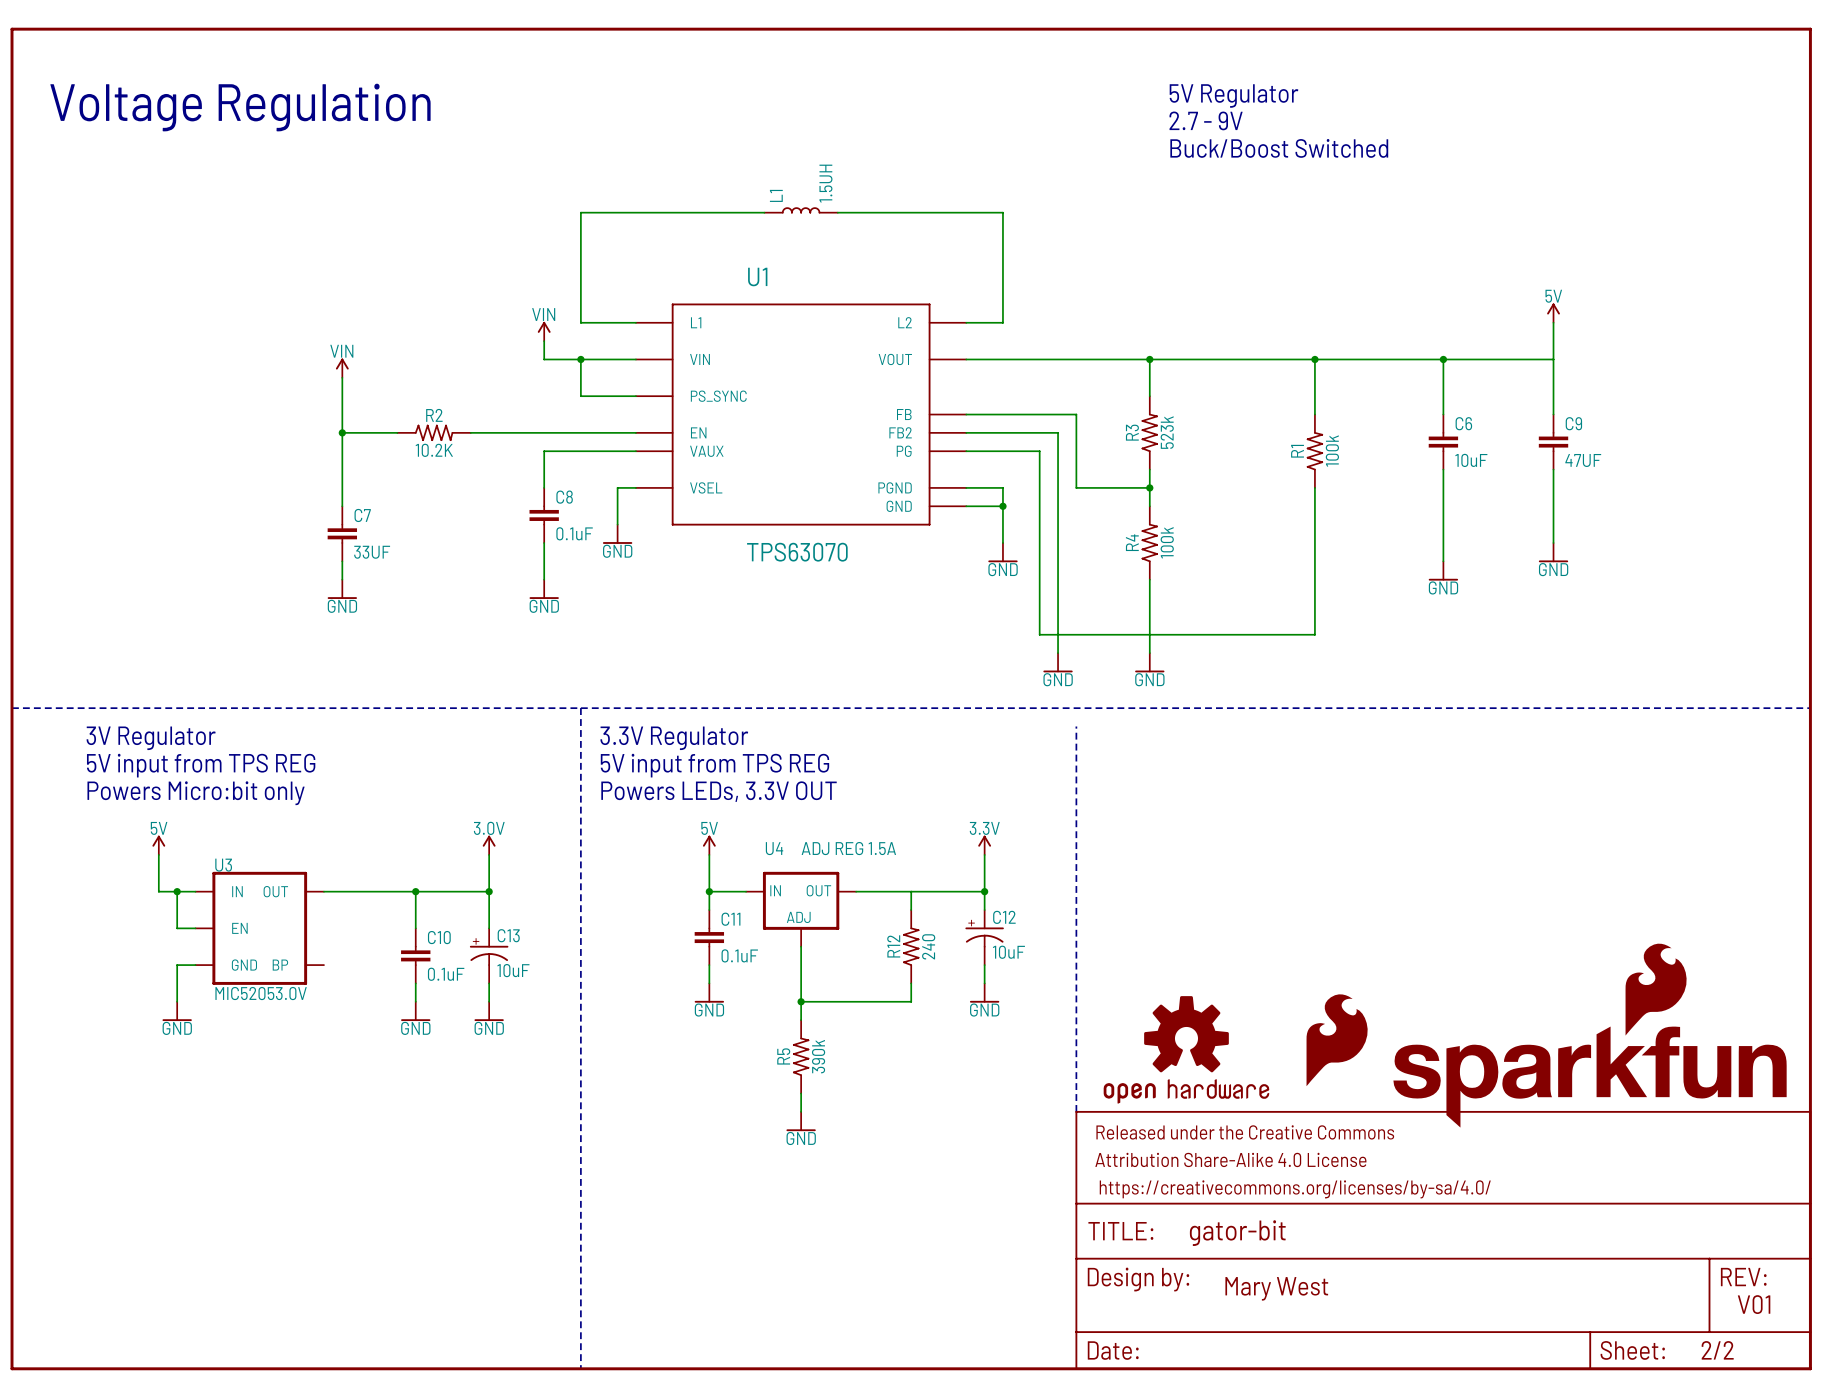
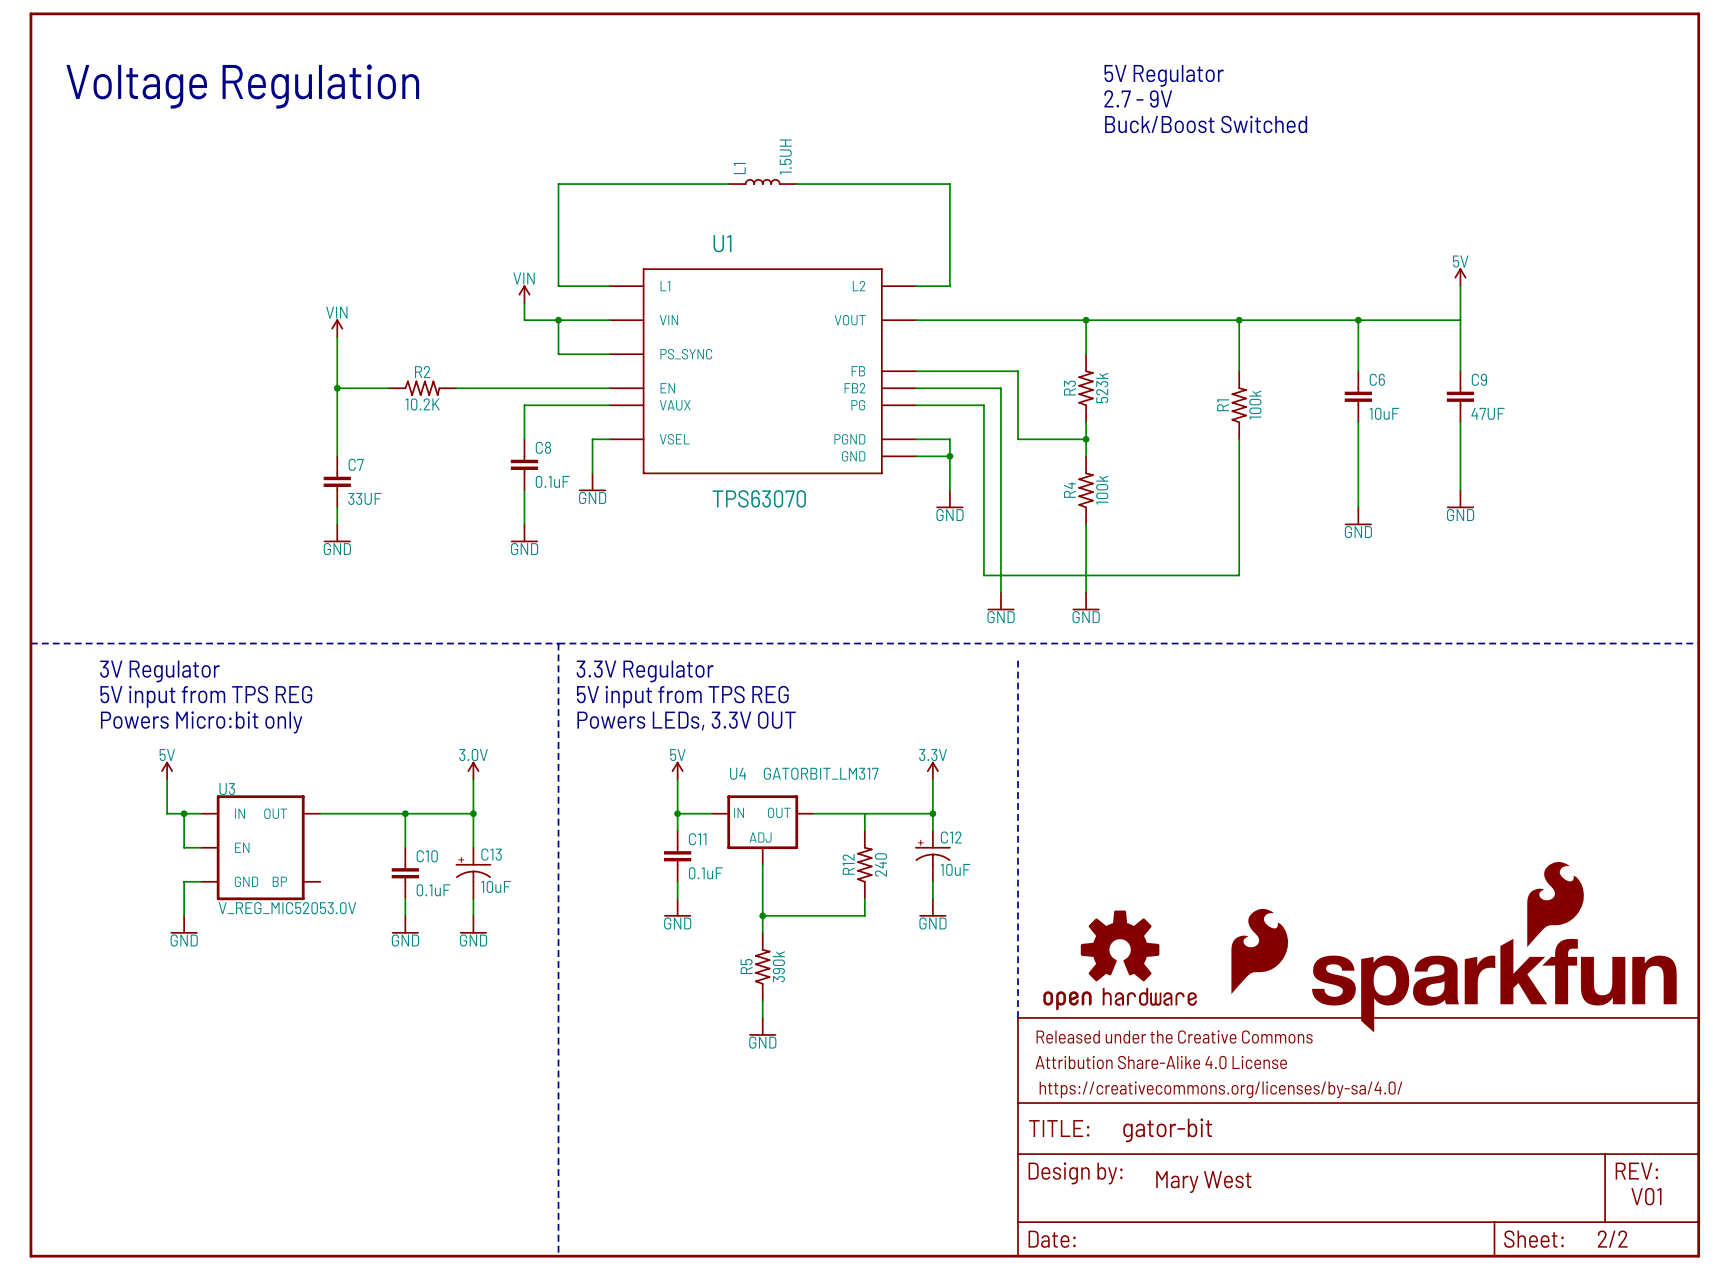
U4 value: ADJ REG 1.5A (848, 848) -> GATORBIT_LM317 (821, 773)
U3 value: MIC52053.0V (261, 993) -> V_REG_MIC52053.0V (287, 908)

